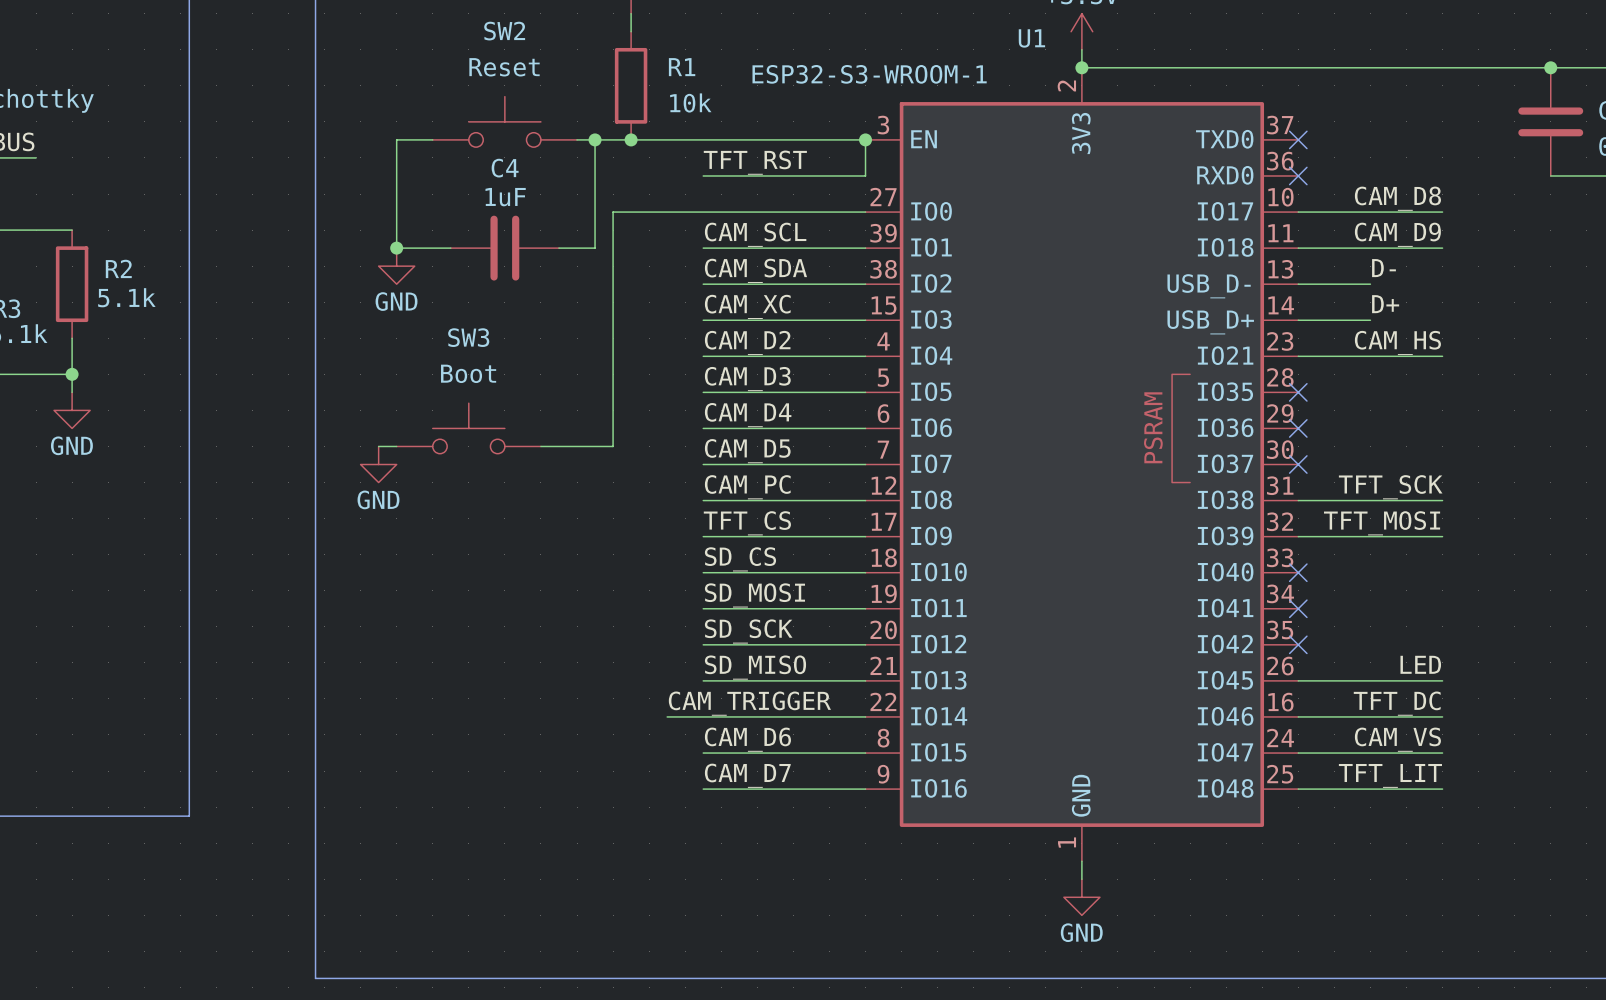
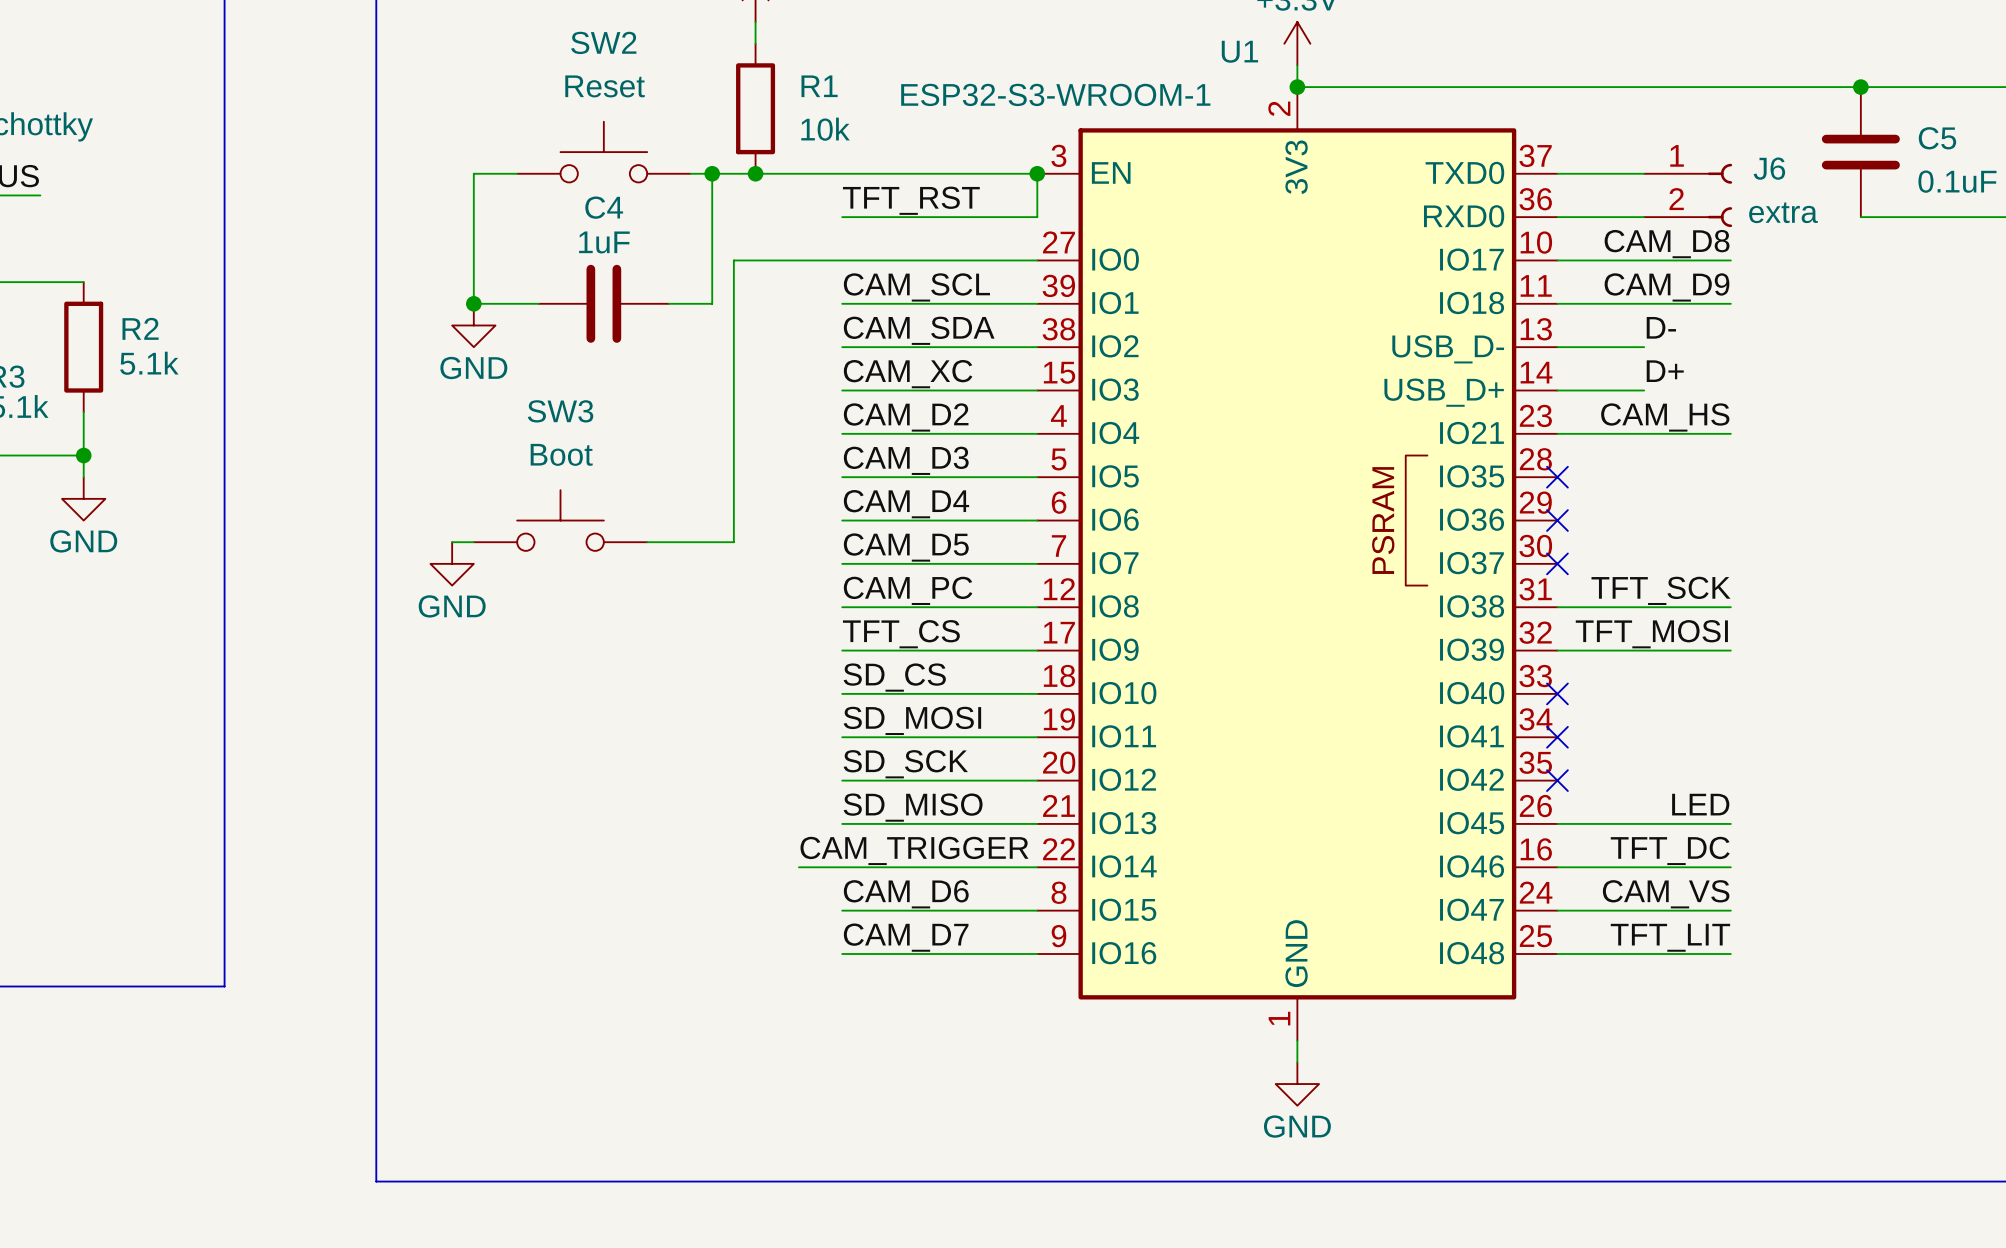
wire: none -> (1557, 173) (1644, 173)
no-connect mark: (1298, 139) -> none
J6: none -> extra (1688, 195)
wire: none -> (1557, 217) (1644, 217)
no-connect mark: (1298, 175) -> none

